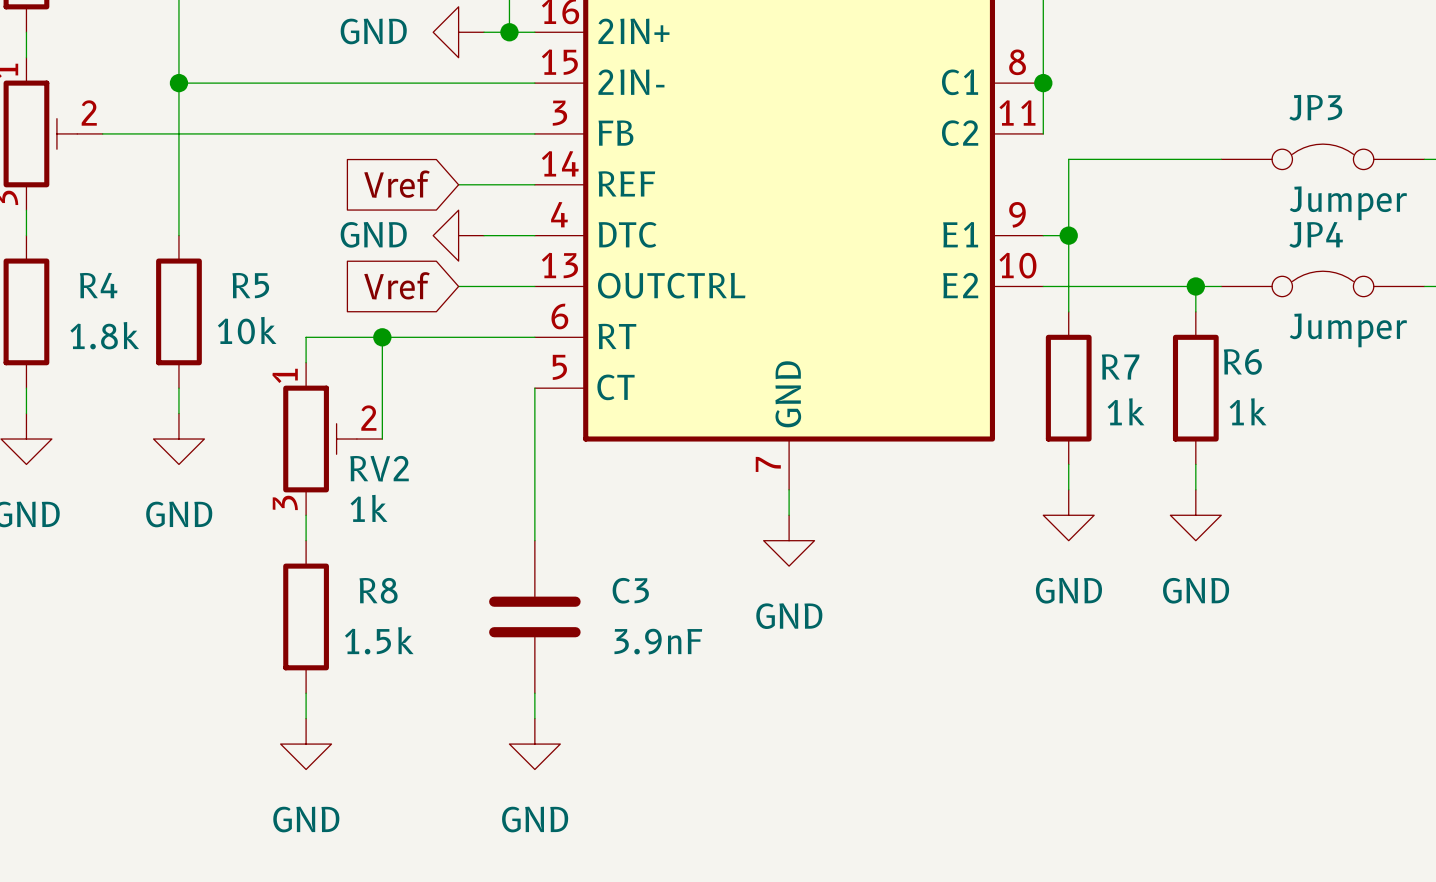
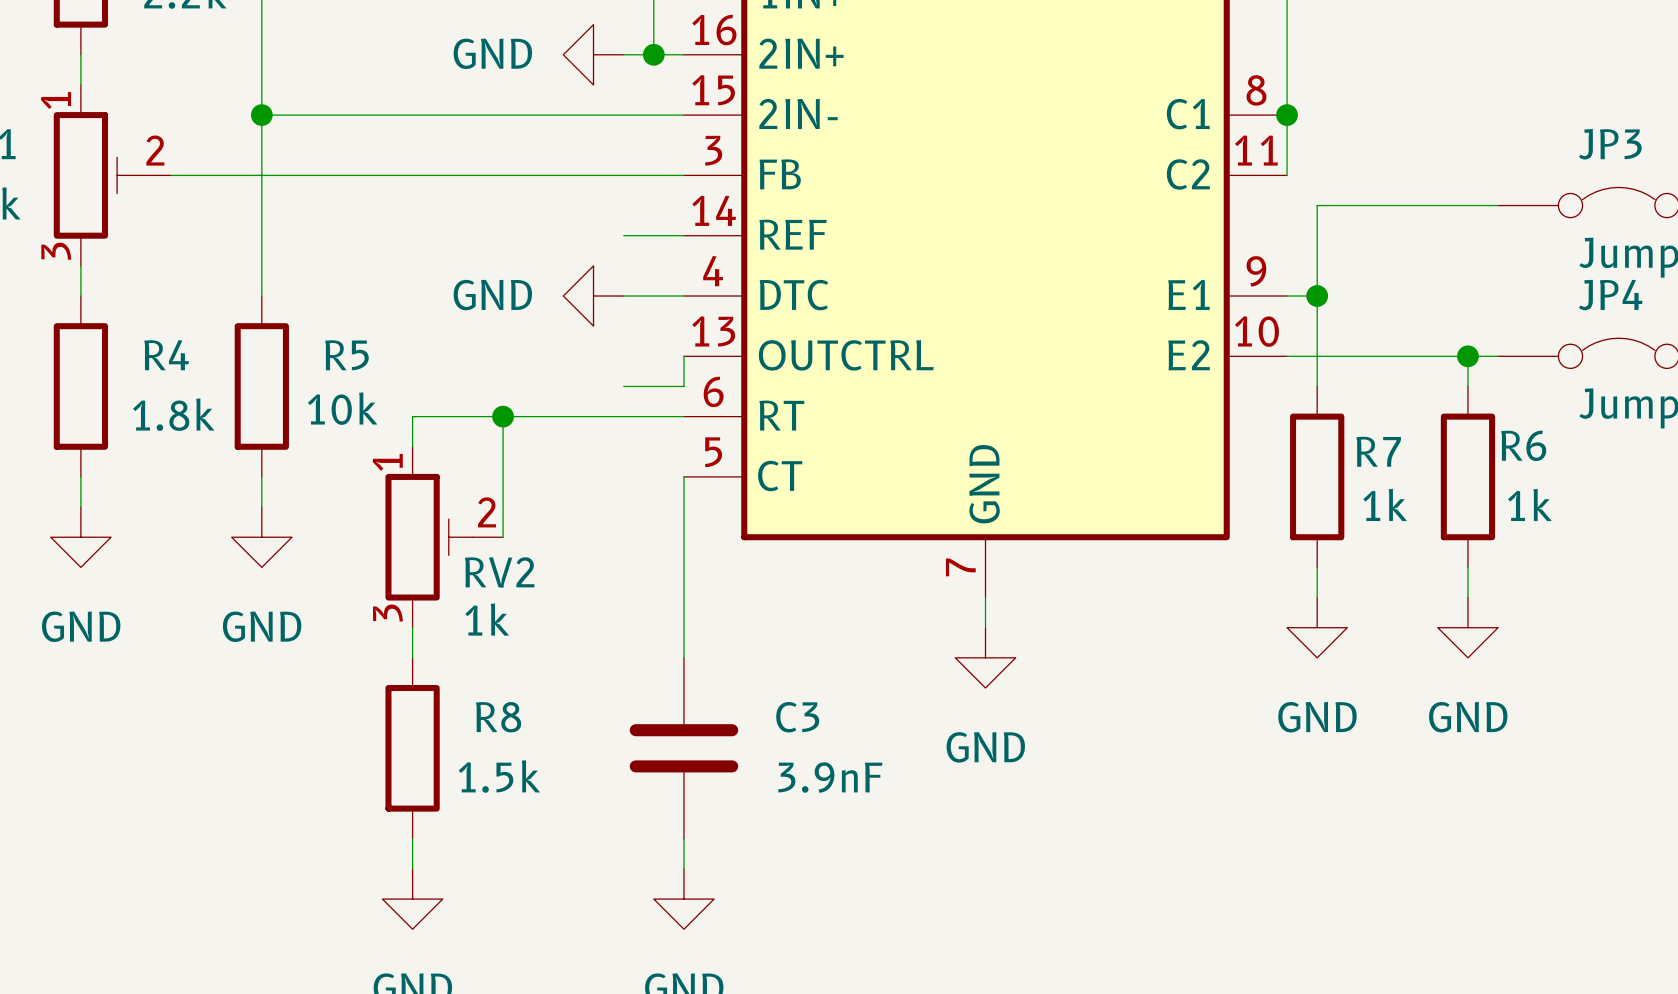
global label: Vref (397, 184) -> none
wire: (458, 184) (484, 184) -> none
global label: Vref (397, 285) -> none
wire: (458, 286) (534, 286) -> (623, 386) (683, 386) (683, 356)

